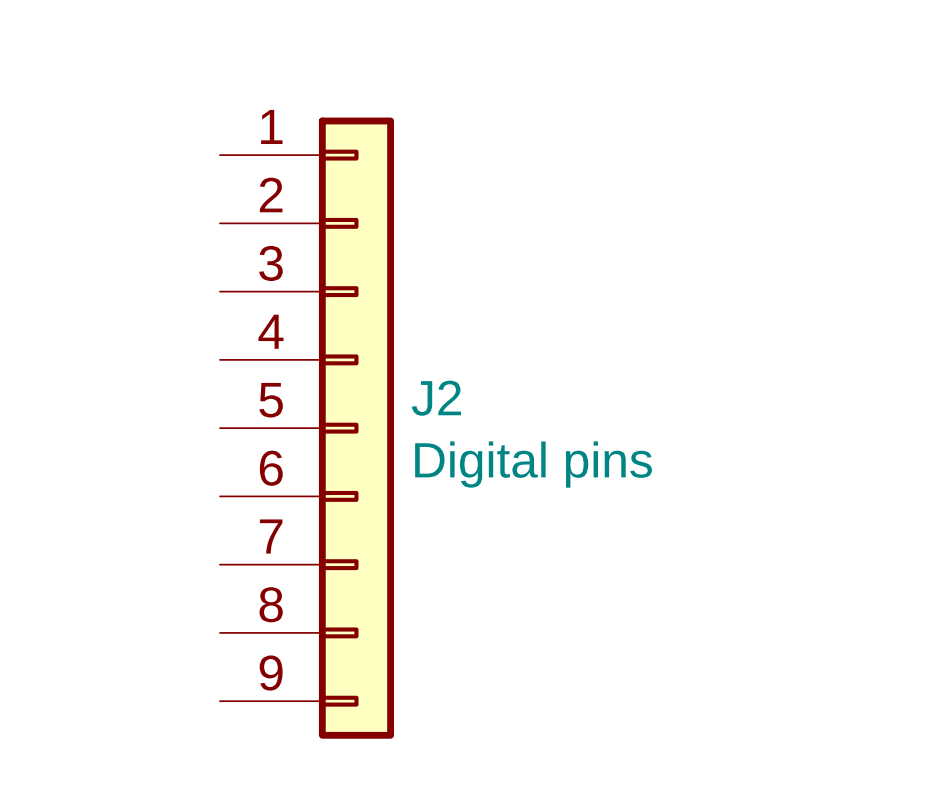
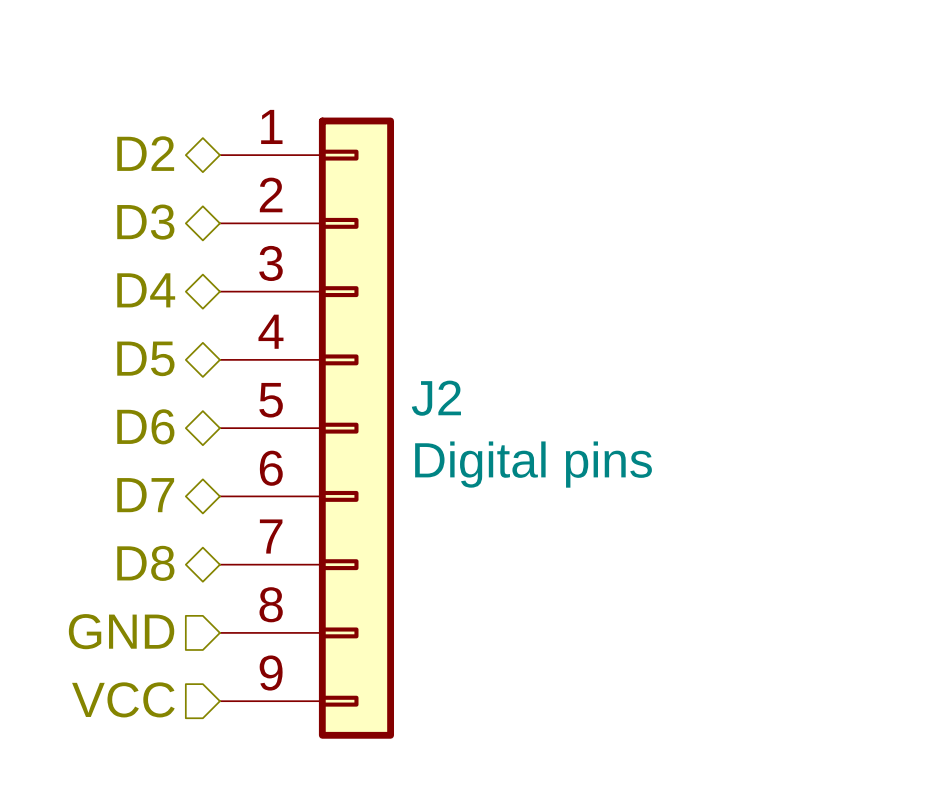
hierarchical label: none -> D2 (145, 153)
hierarchical label: none -> D3 (145, 222)
hierarchical label: none -> D4 (146, 290)
hierarchical label: none -> D5 (145, 358)
hierarchical label: none -> D6 (145, 426)
hierarchical label: none -> D7 (145, 495)
hierarchical label: none -> D8 (145, 563)
hierarchical label: none -> GND (121, 631)
hierarchical label: none -> VCC (123, 699)

